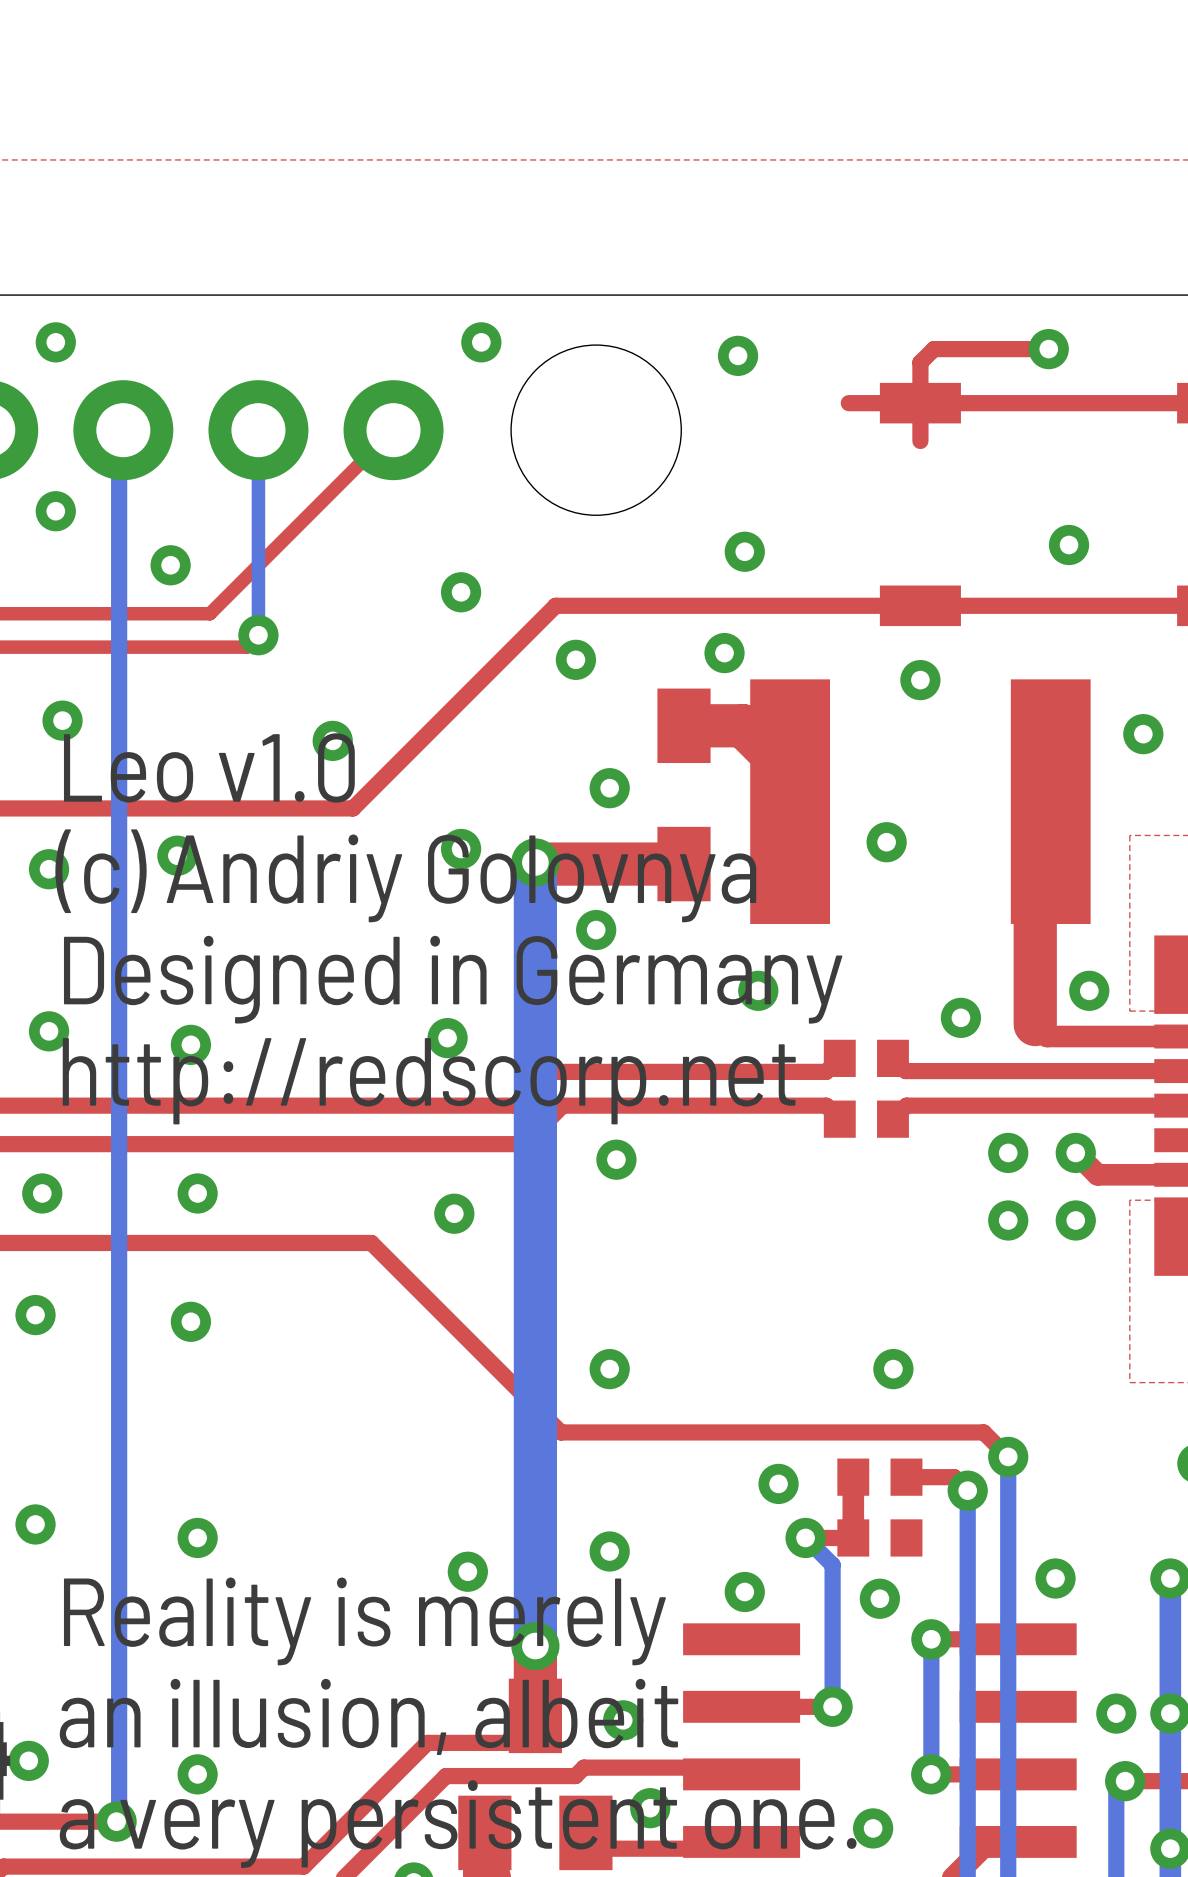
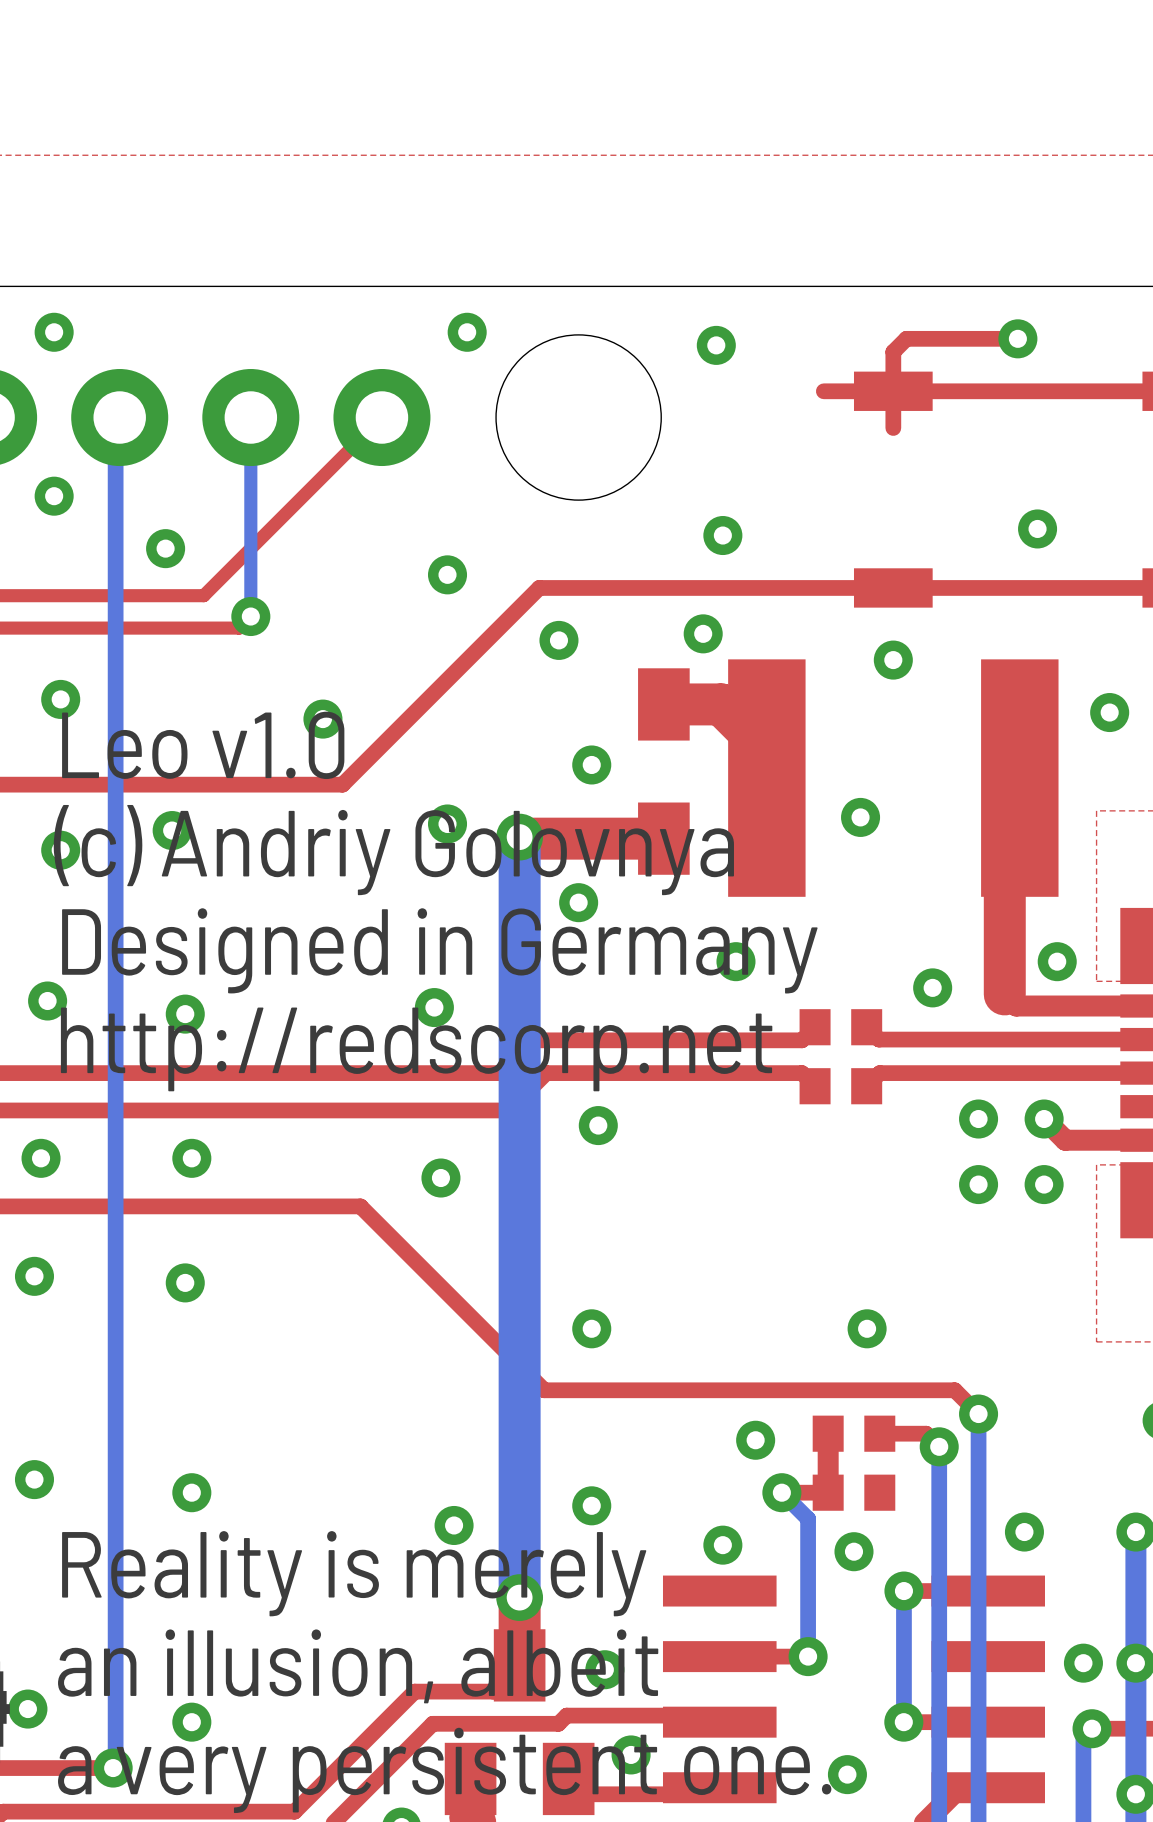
via position: (49, 869) -> (60, 850)

